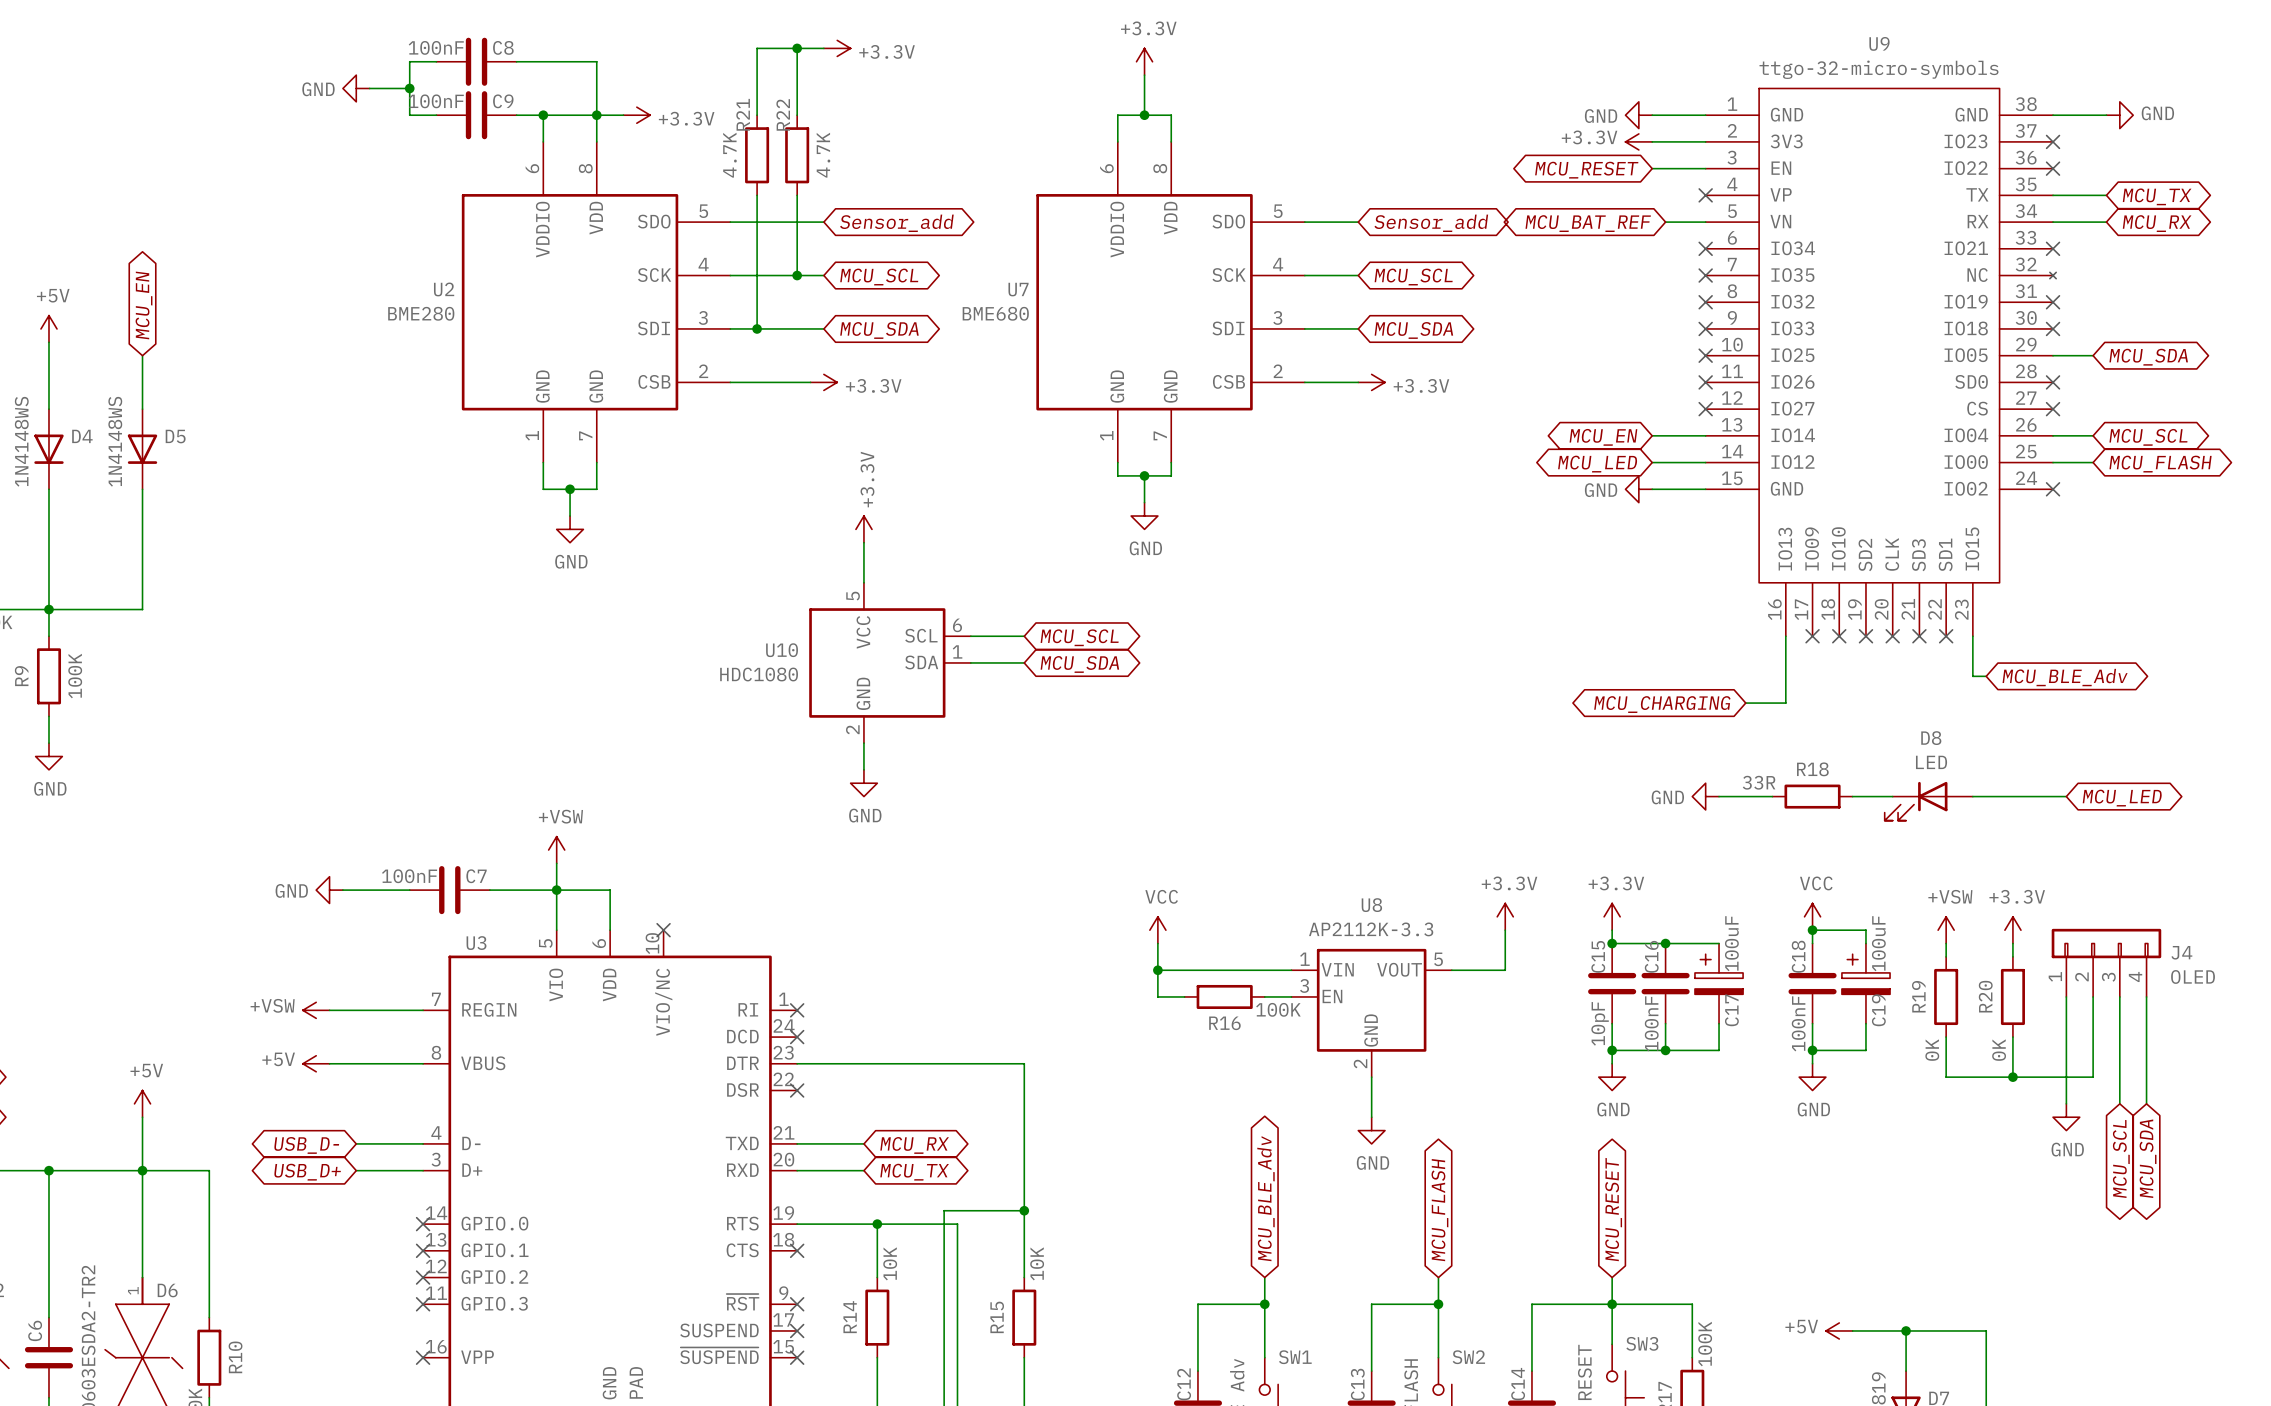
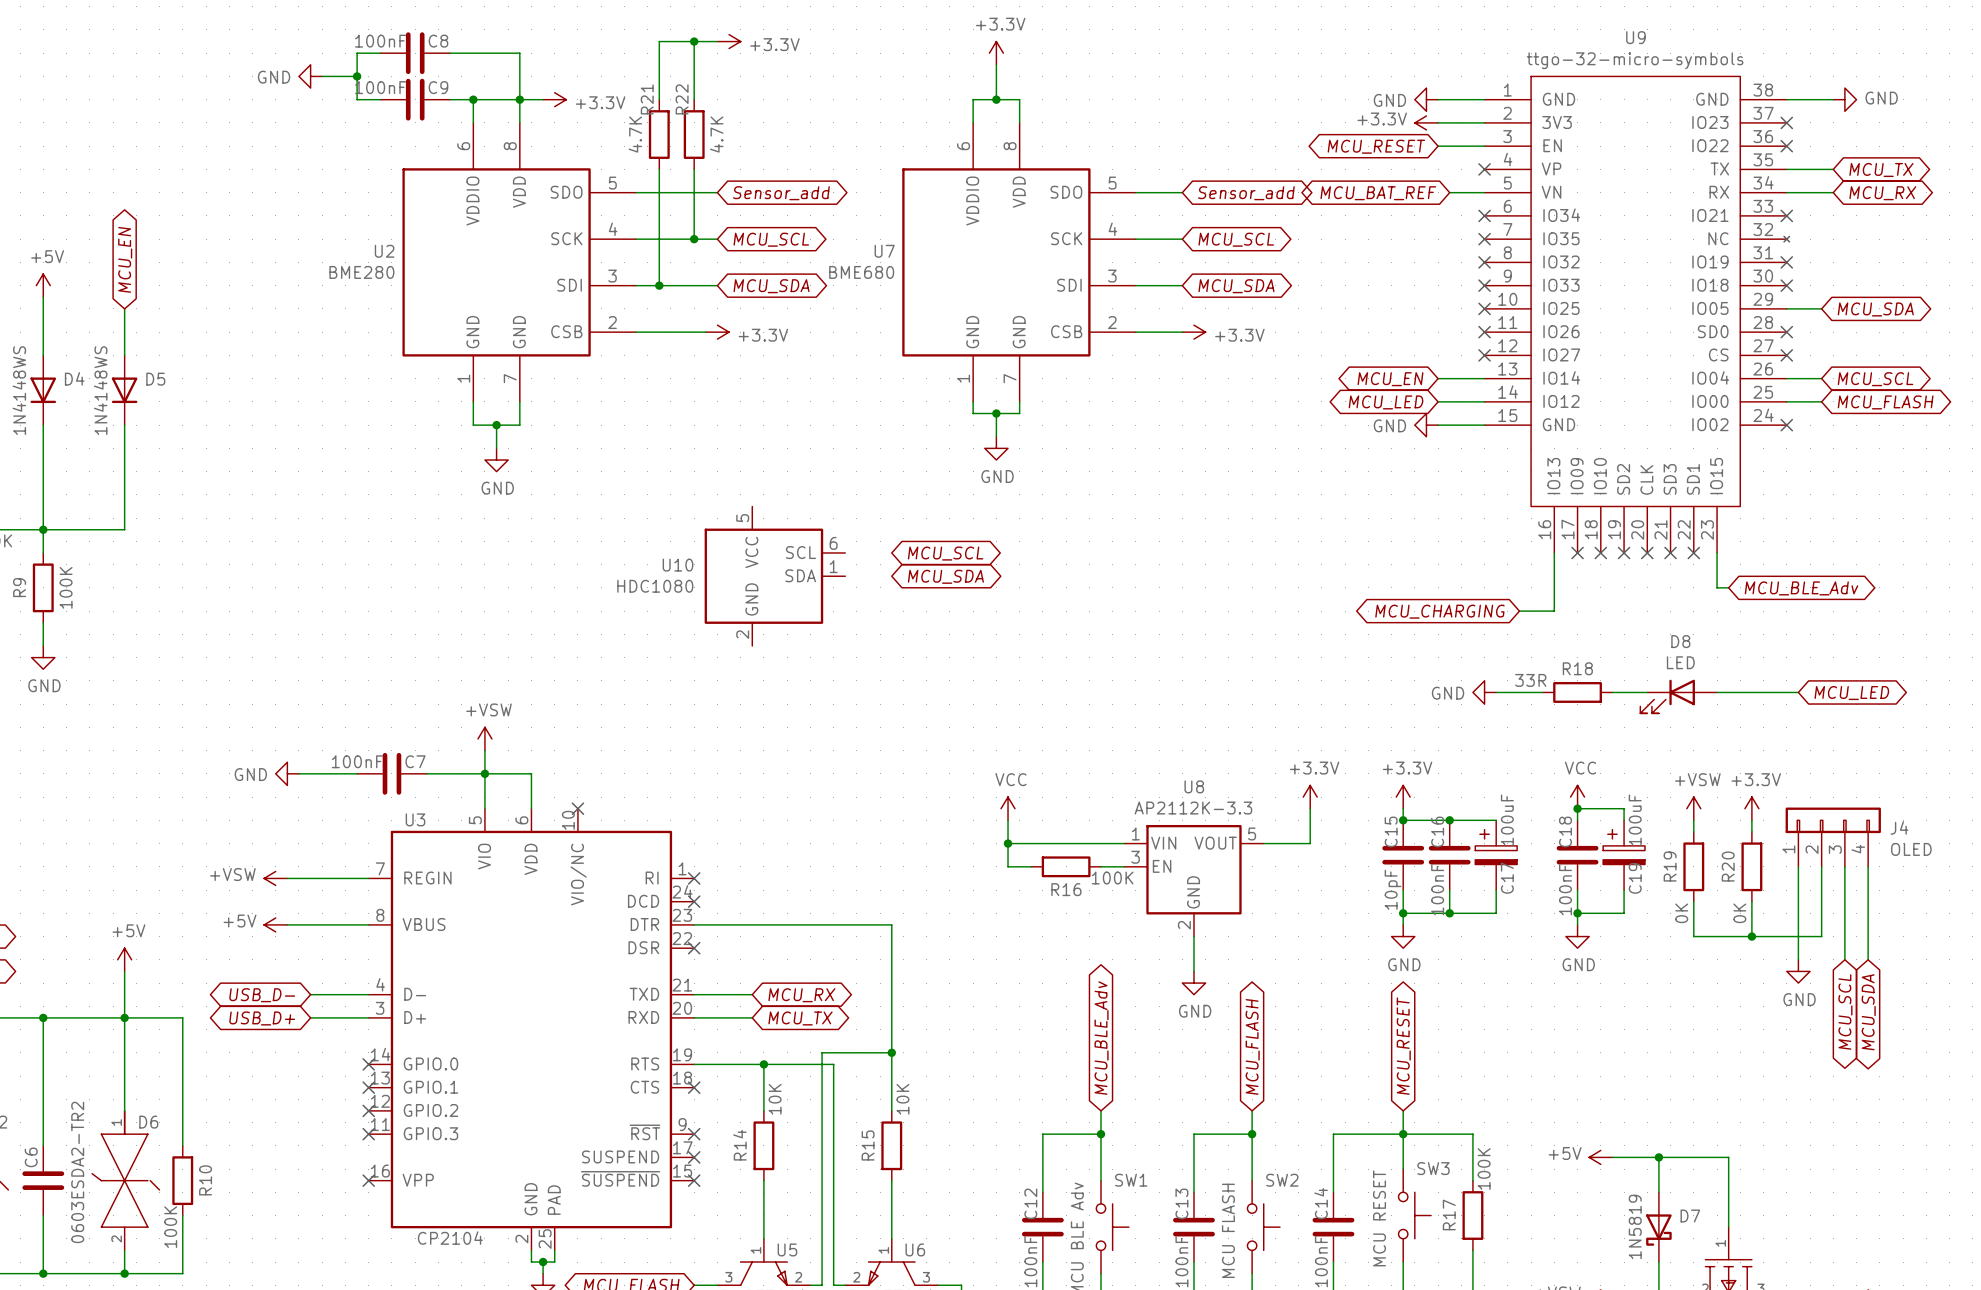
power symbol: +3.3V (863, 529) -> none
wire: (863, 542) (863, 582) -> none
wire: (970, 636) (1024, 636) -> none
wire: (970, 662) (1024, 662) -> none
wire: (863, 743) (863, 769) -> none
power symbol: GND (863, 783) -> none

